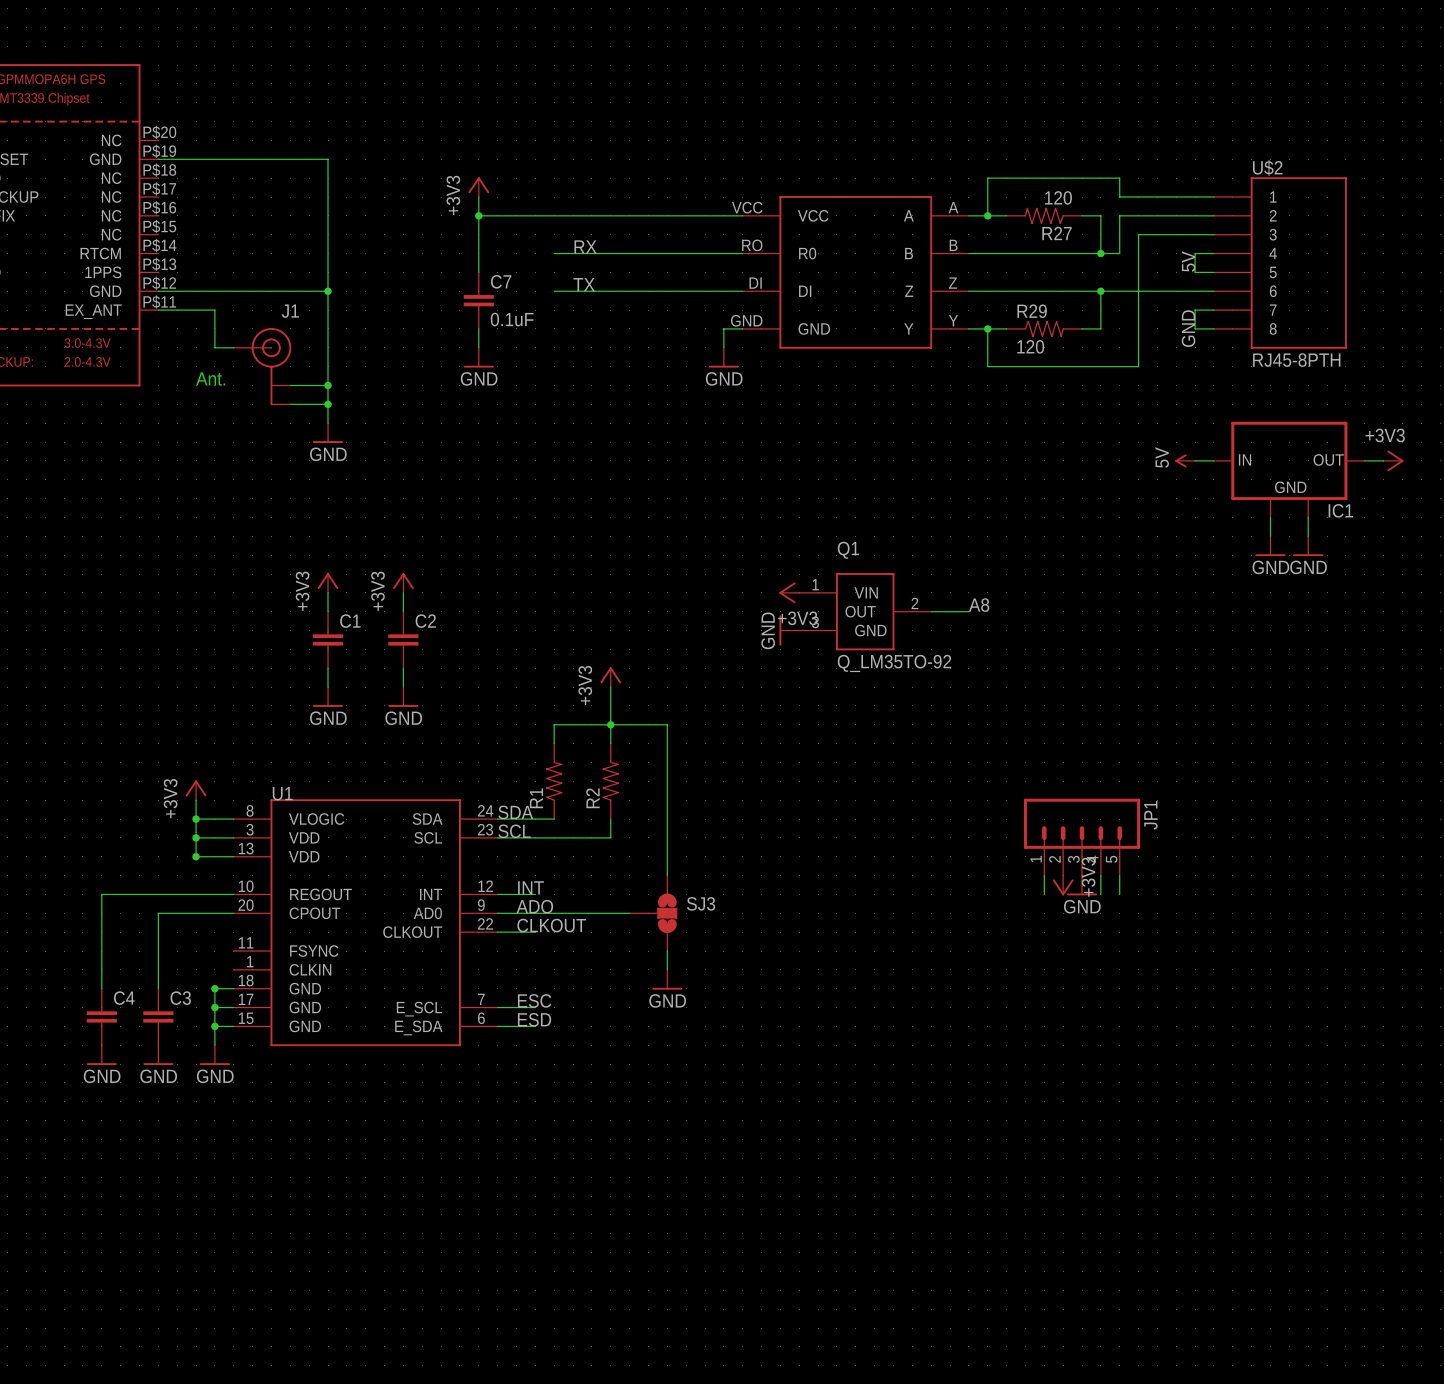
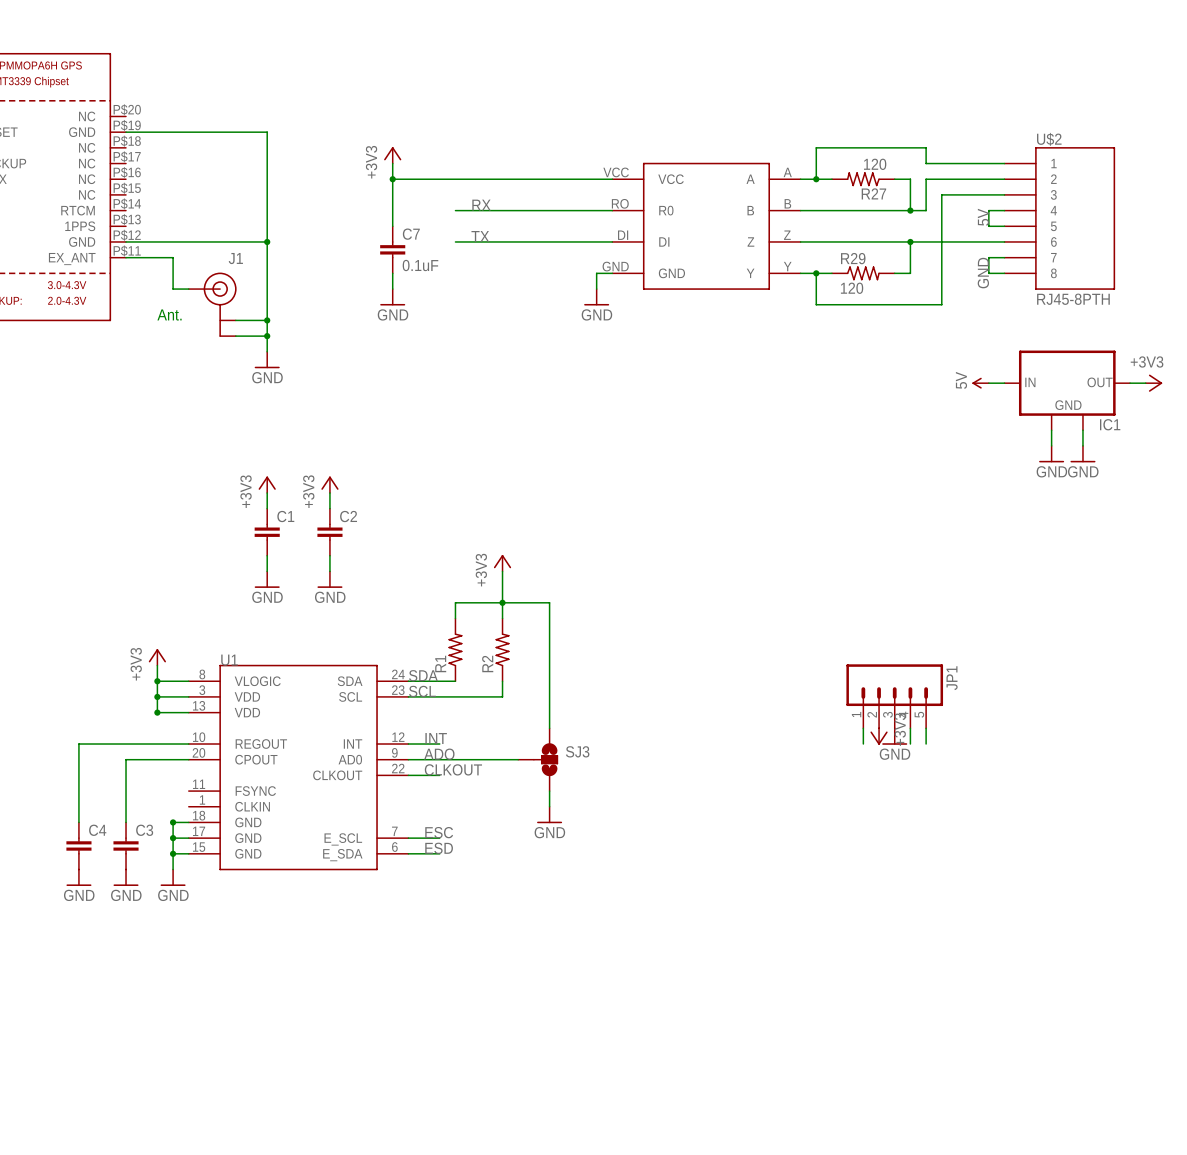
power symbol: +3V3 (789, 592) -> none
label: A8 (979, 605) -> none
Q1: Q_LM35TO-92 (865, 611) -> none
wire: (931, 611) (968, 611) -> none
power symbol: GND (789, 630) -> none

